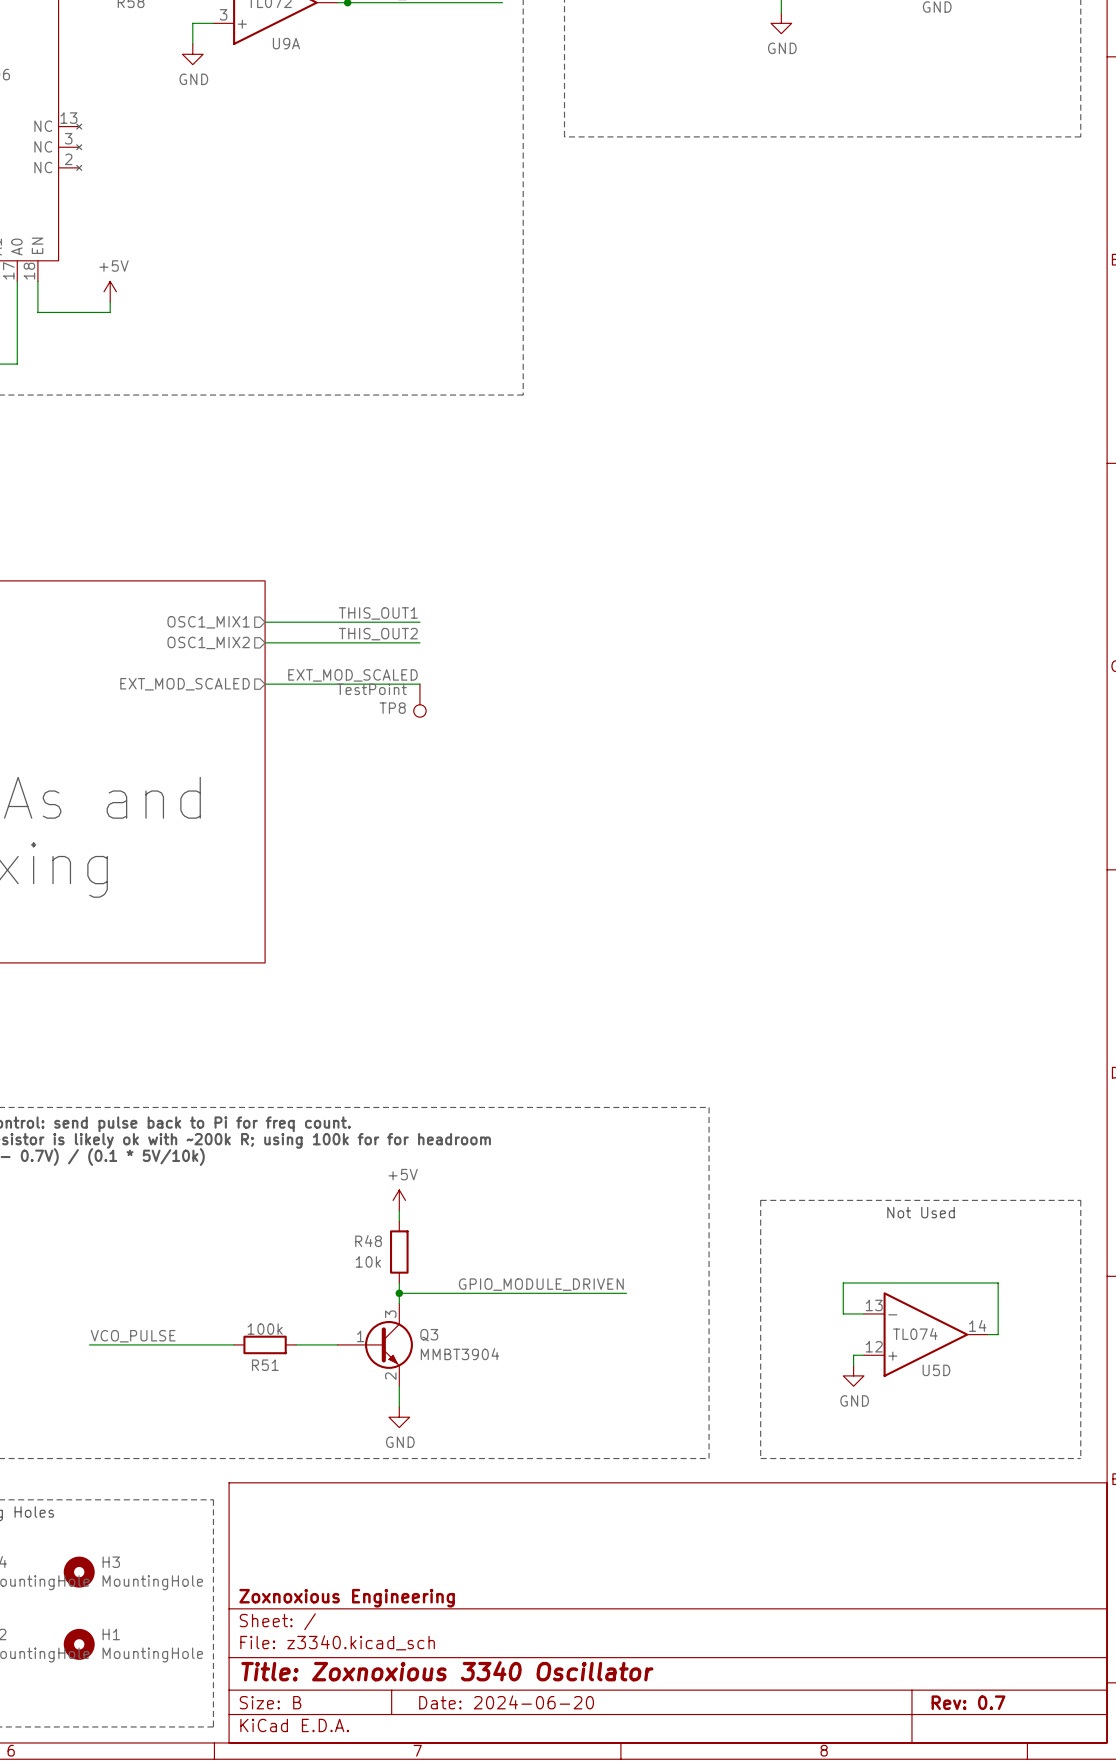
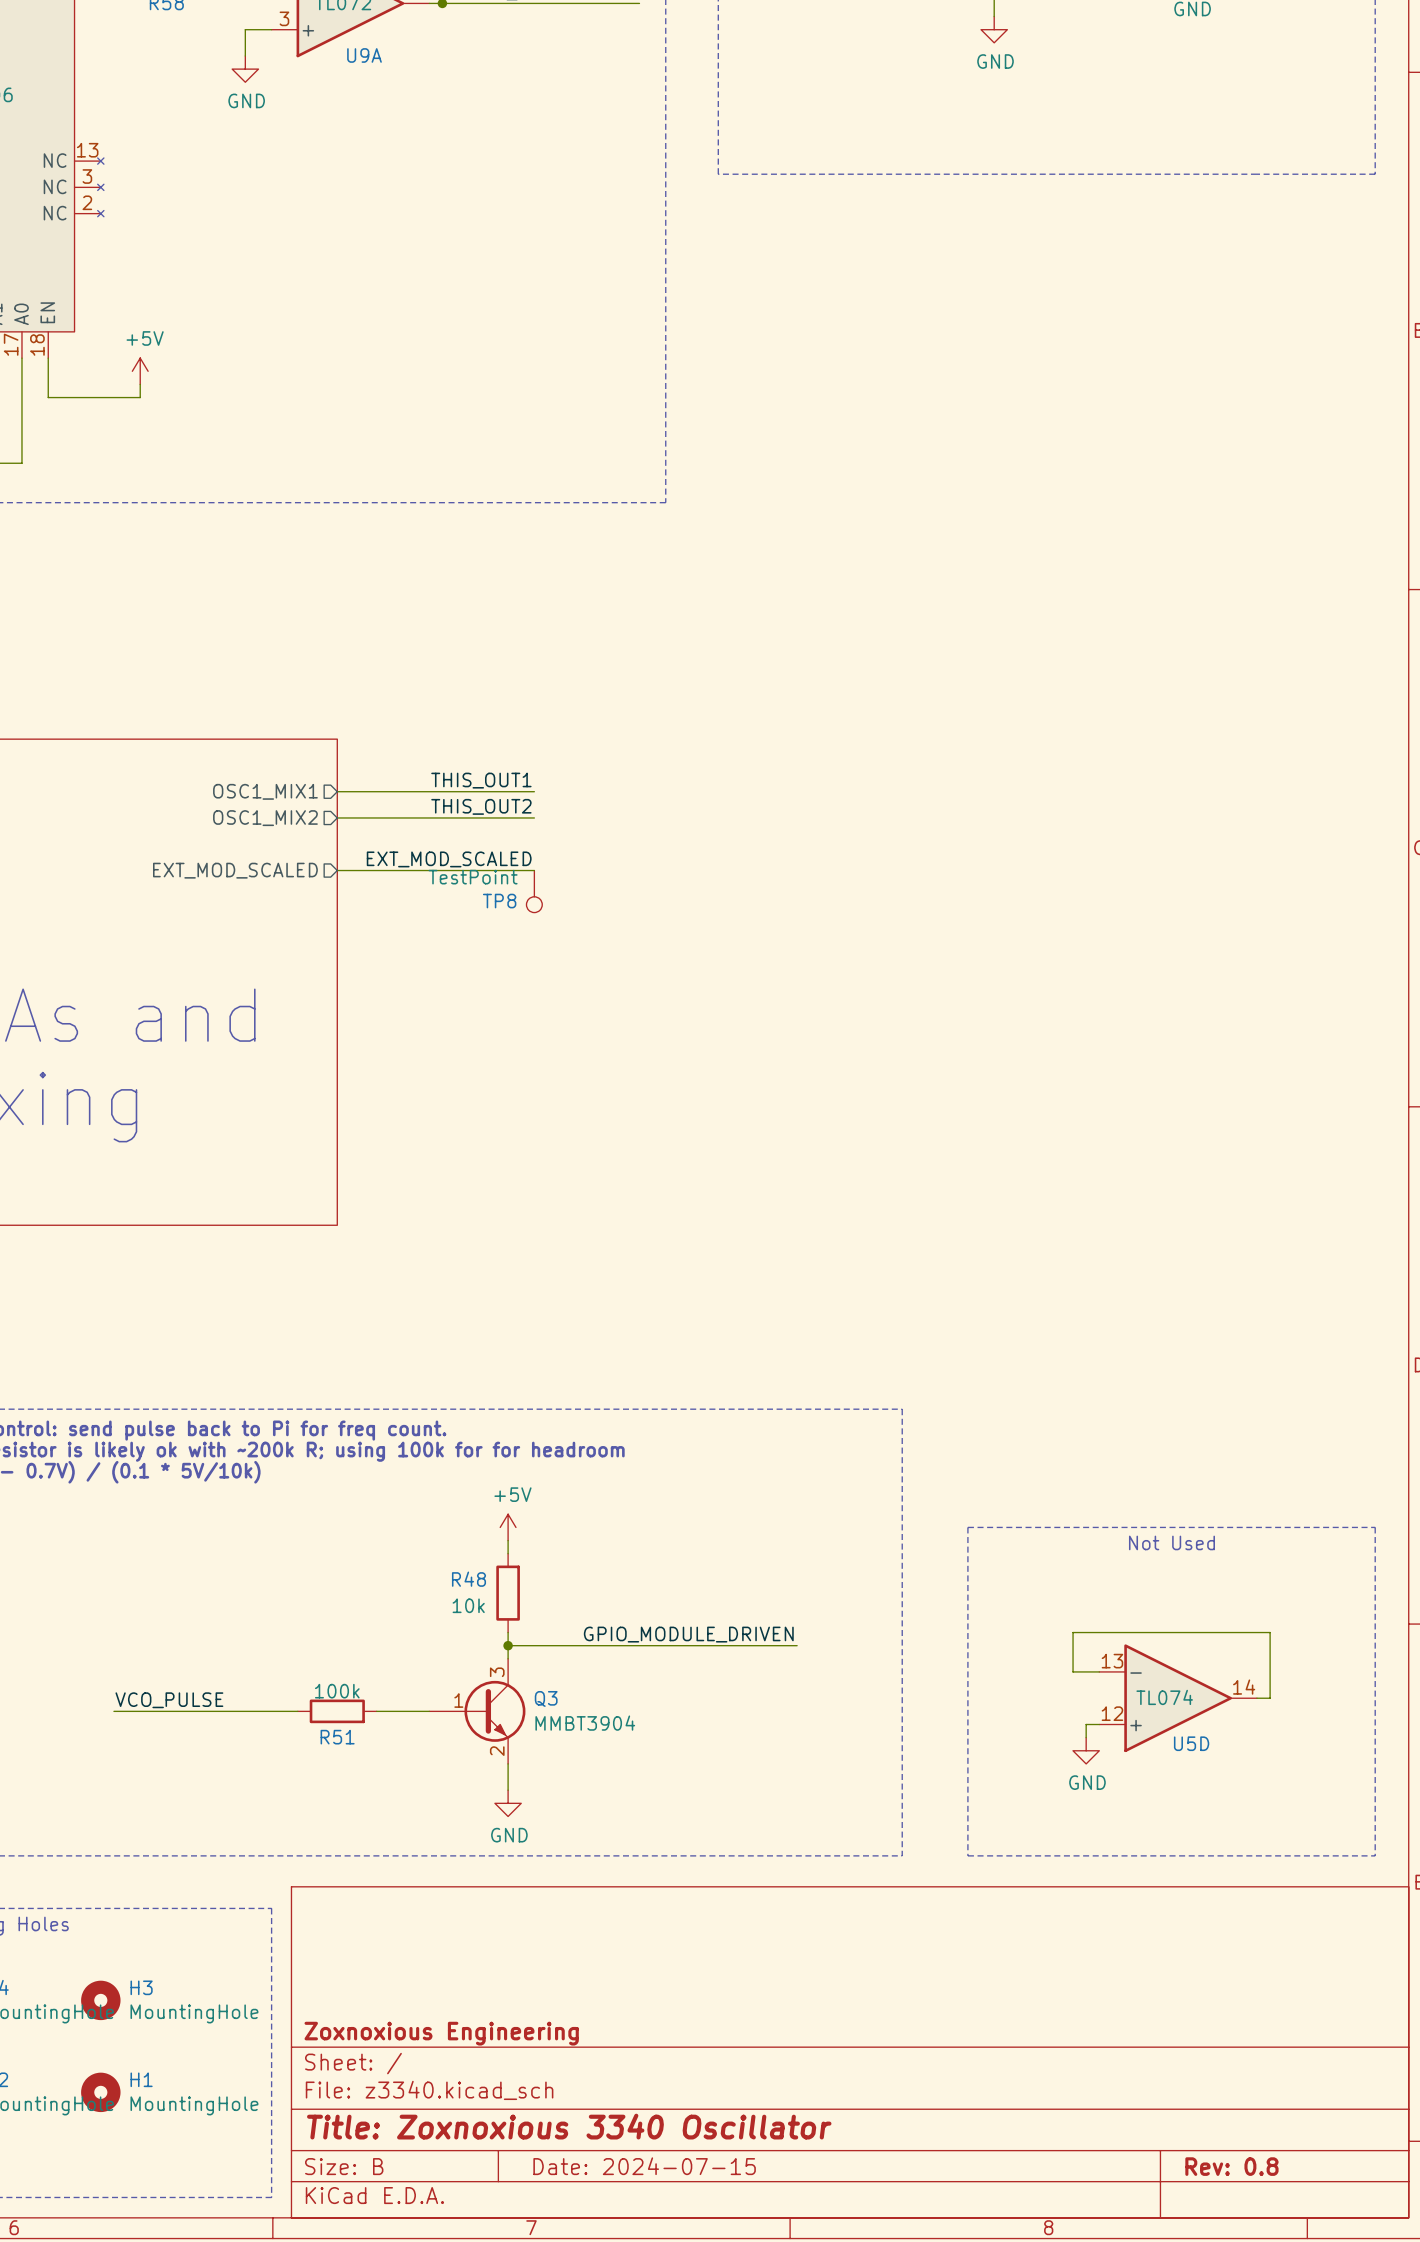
title block: Date: 2024-06-20 (506, 1702) -> Date: 2024-07-15 (644, 2166)
title block: Rev: 0.7 (968, 1702) -> Rev: 0.8 (1231, 2166)

